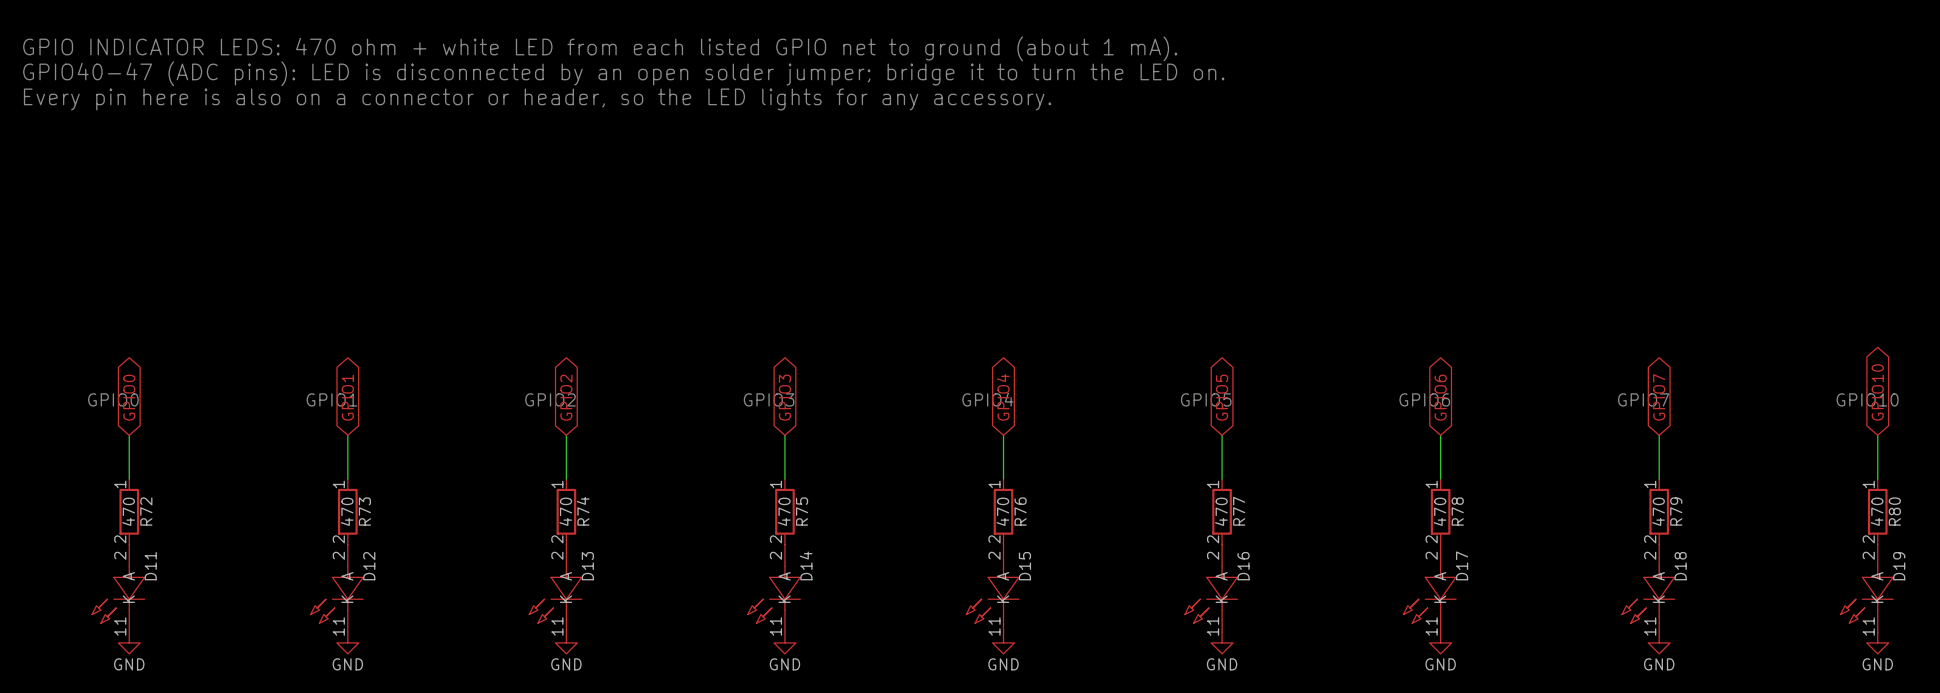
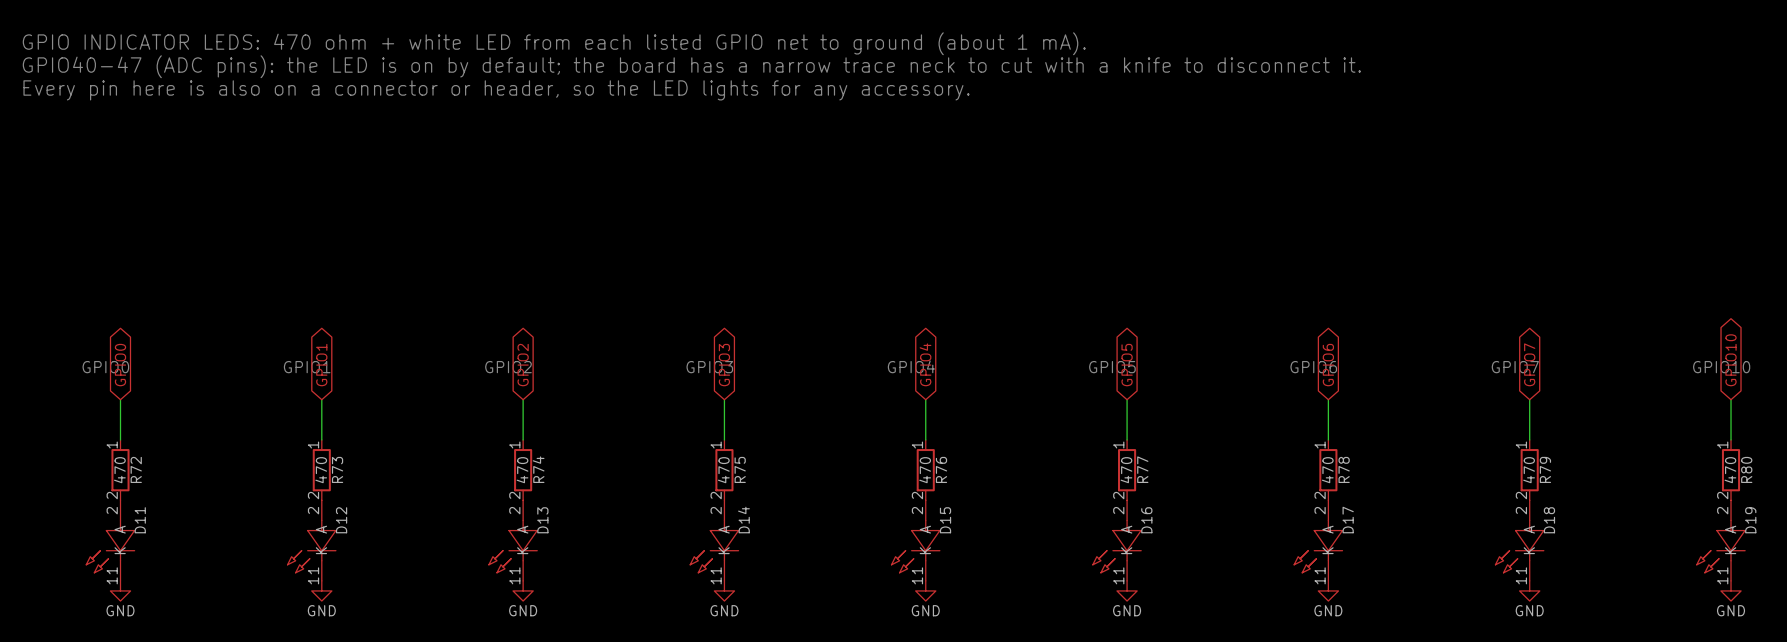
text: GPIO40-47 (ADC pins): LED is disconnected by an open solder jumper; bridge it to turn the LED on. (623, 73) -> GPIO40-47 (ADC pins): the LED is on by default; the board has a narrow trace neck to cut with a knife to disconnect it. (691, 66)

